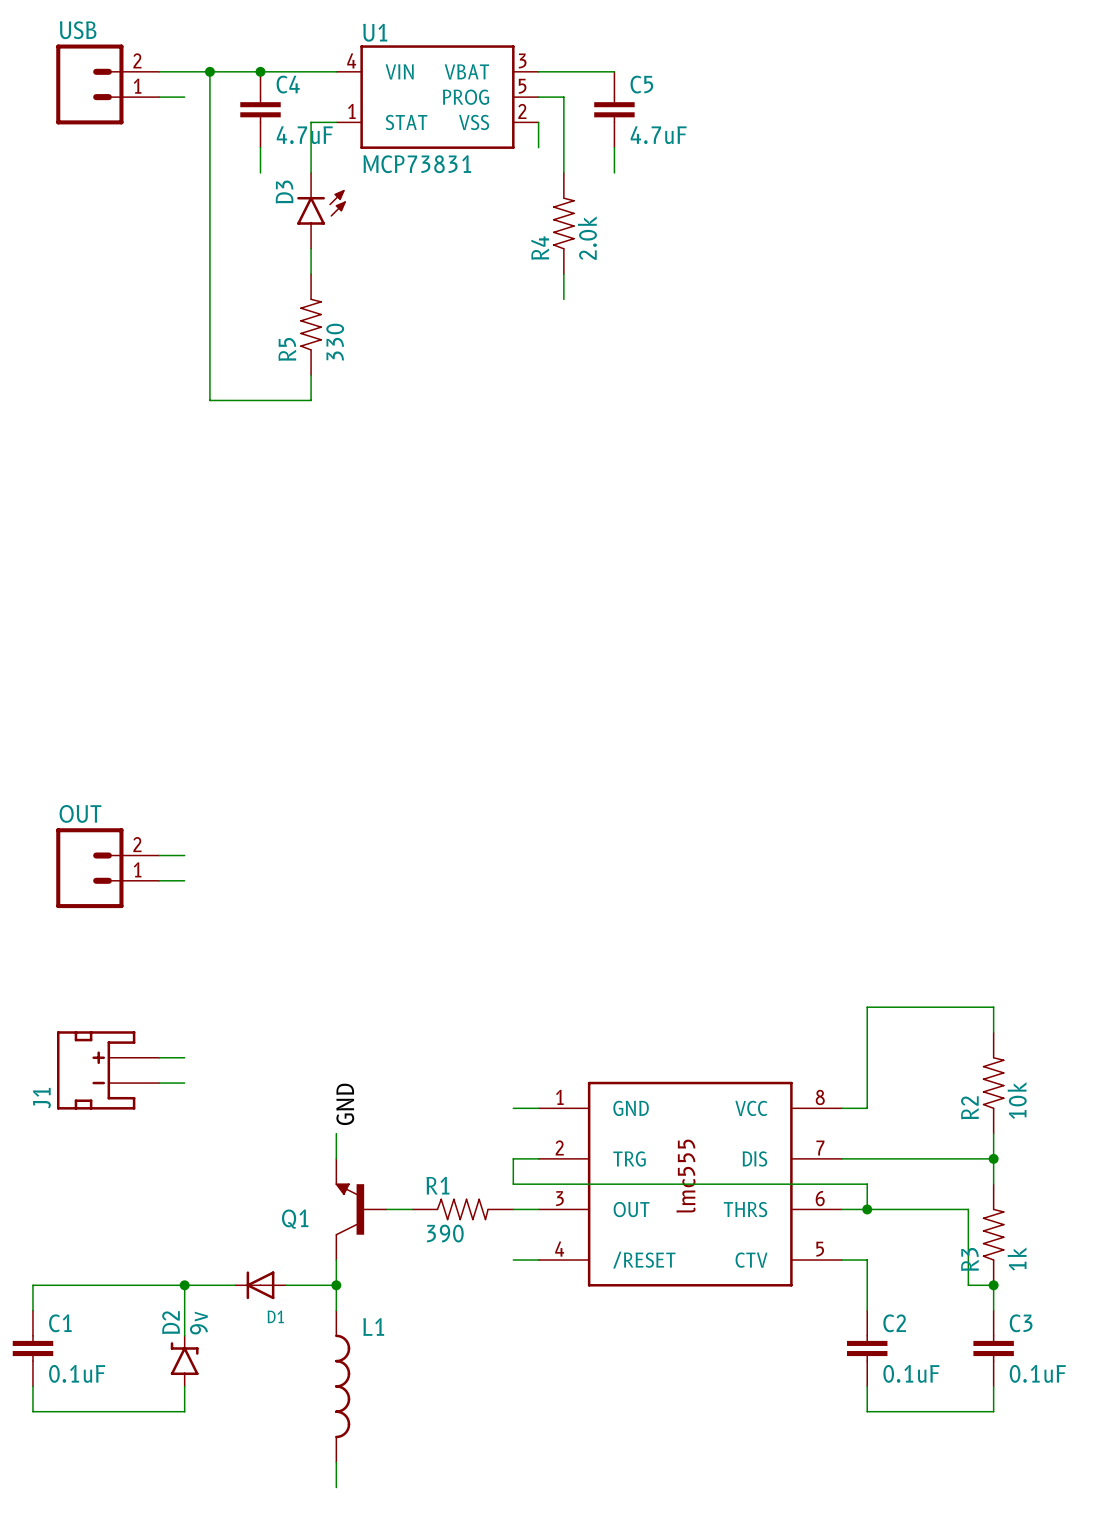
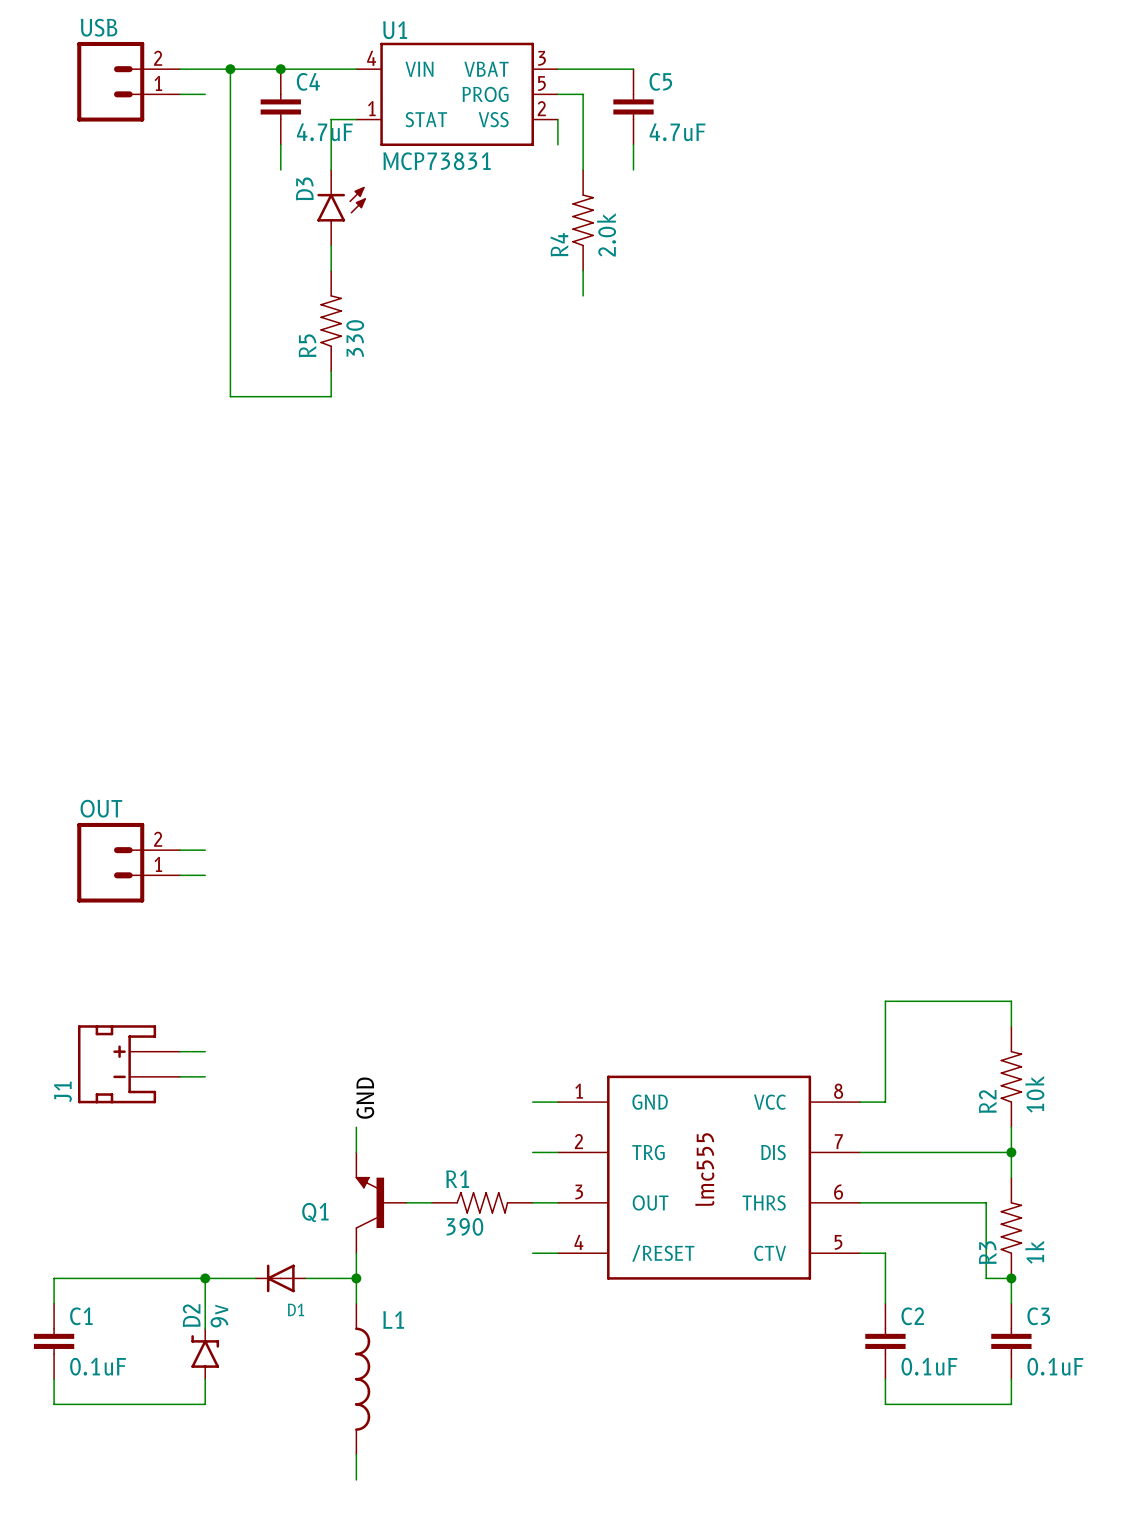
wire: (513, 1158) (513, 1184) (867, 1184) (867, 1209) -> none
junction: (867, 1209) -> none

